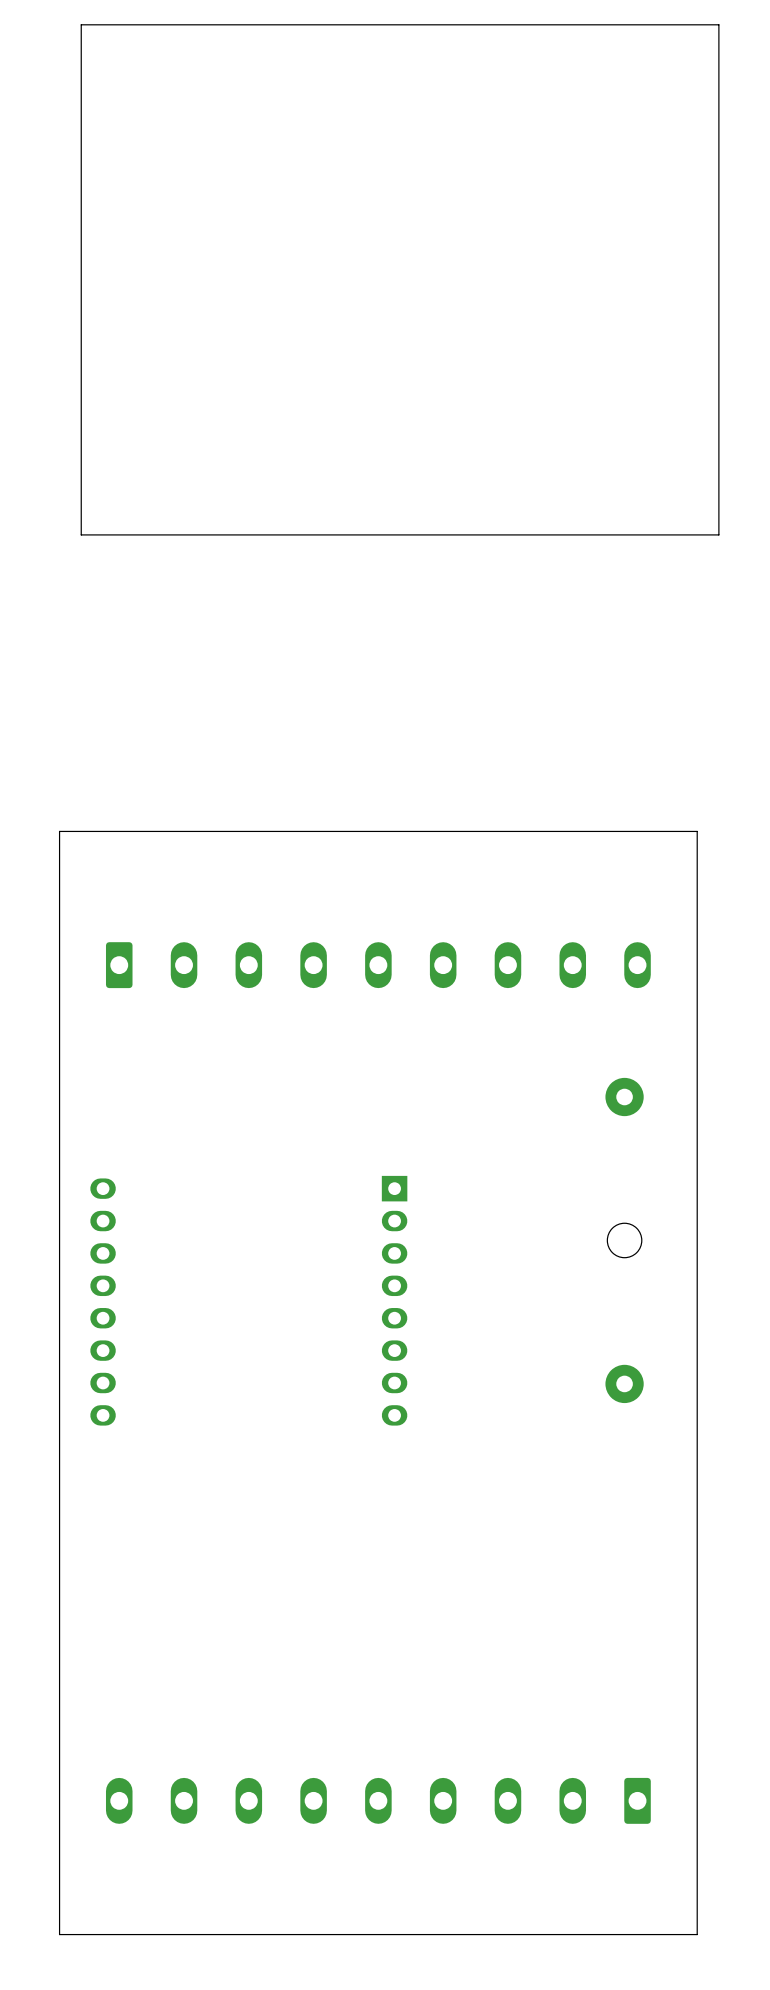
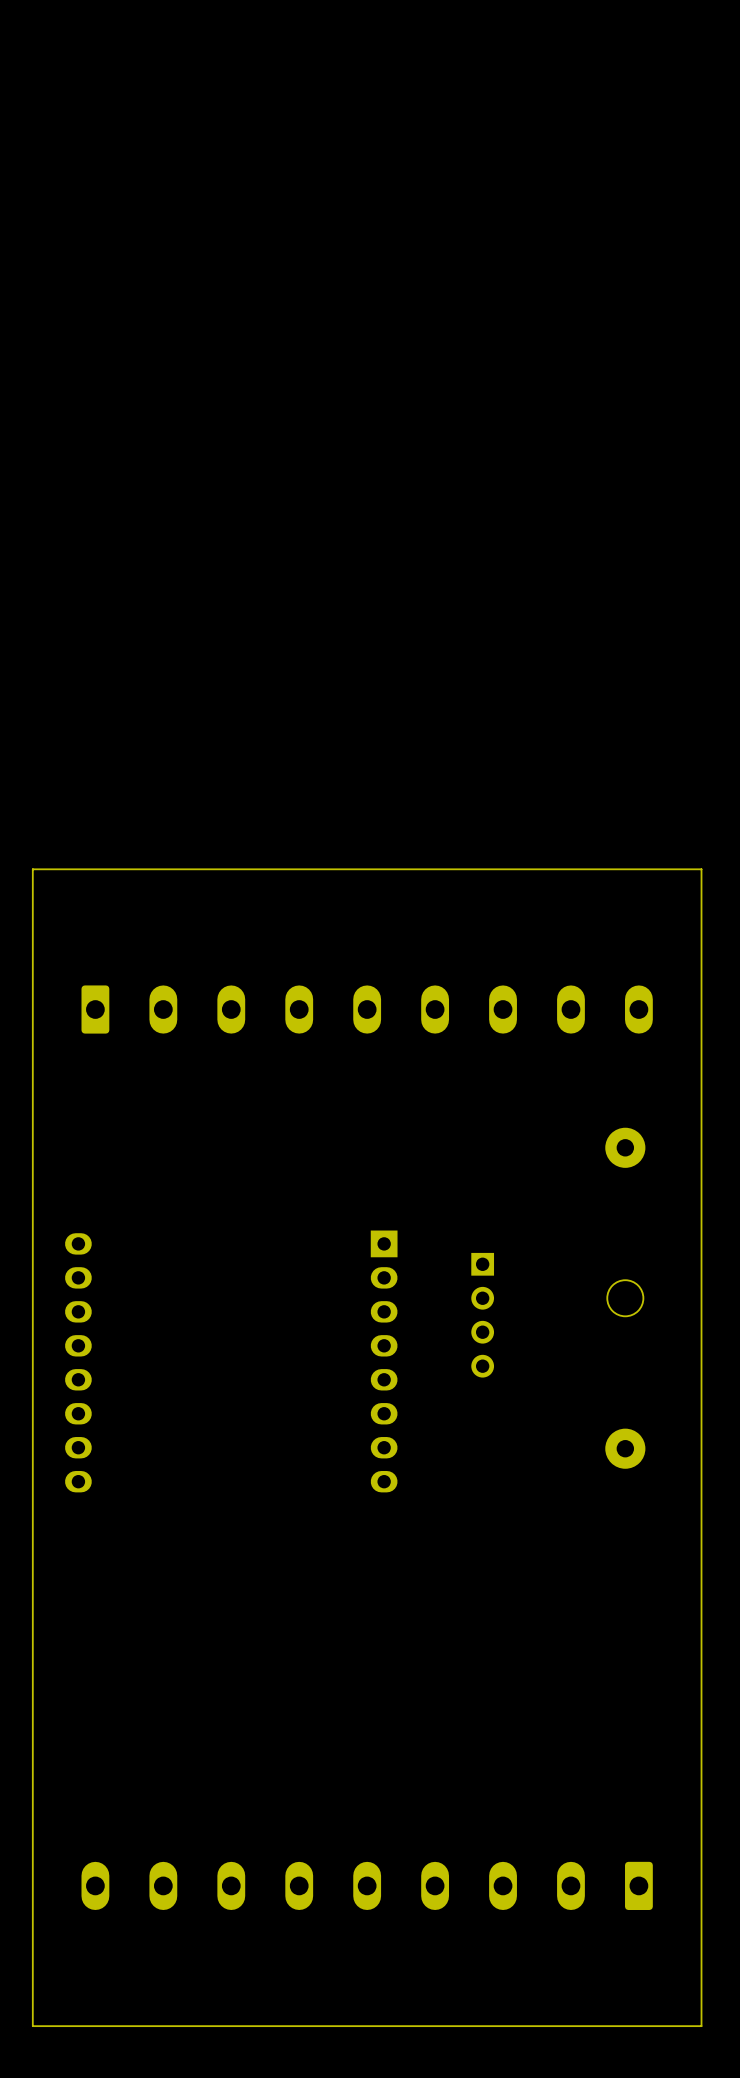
board edge: (718, 24) (718, 534) (81, 534) (81, 24) (718, 24) -> none
part: none -> (482, 1315)

